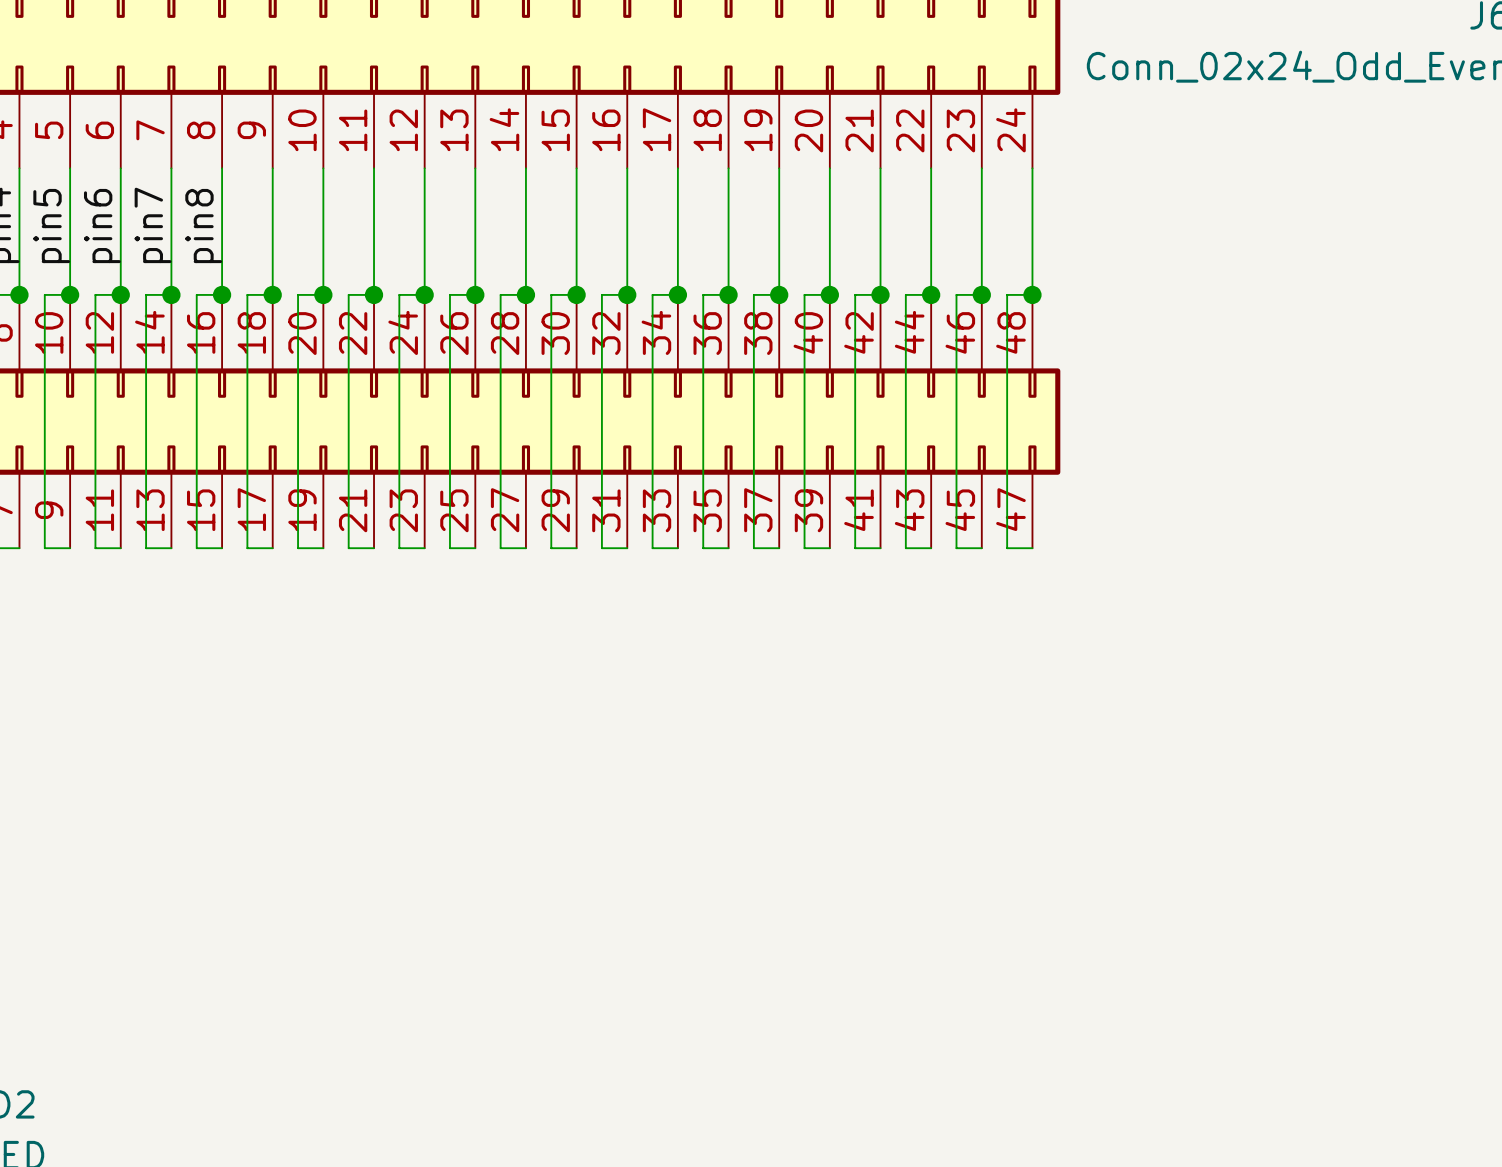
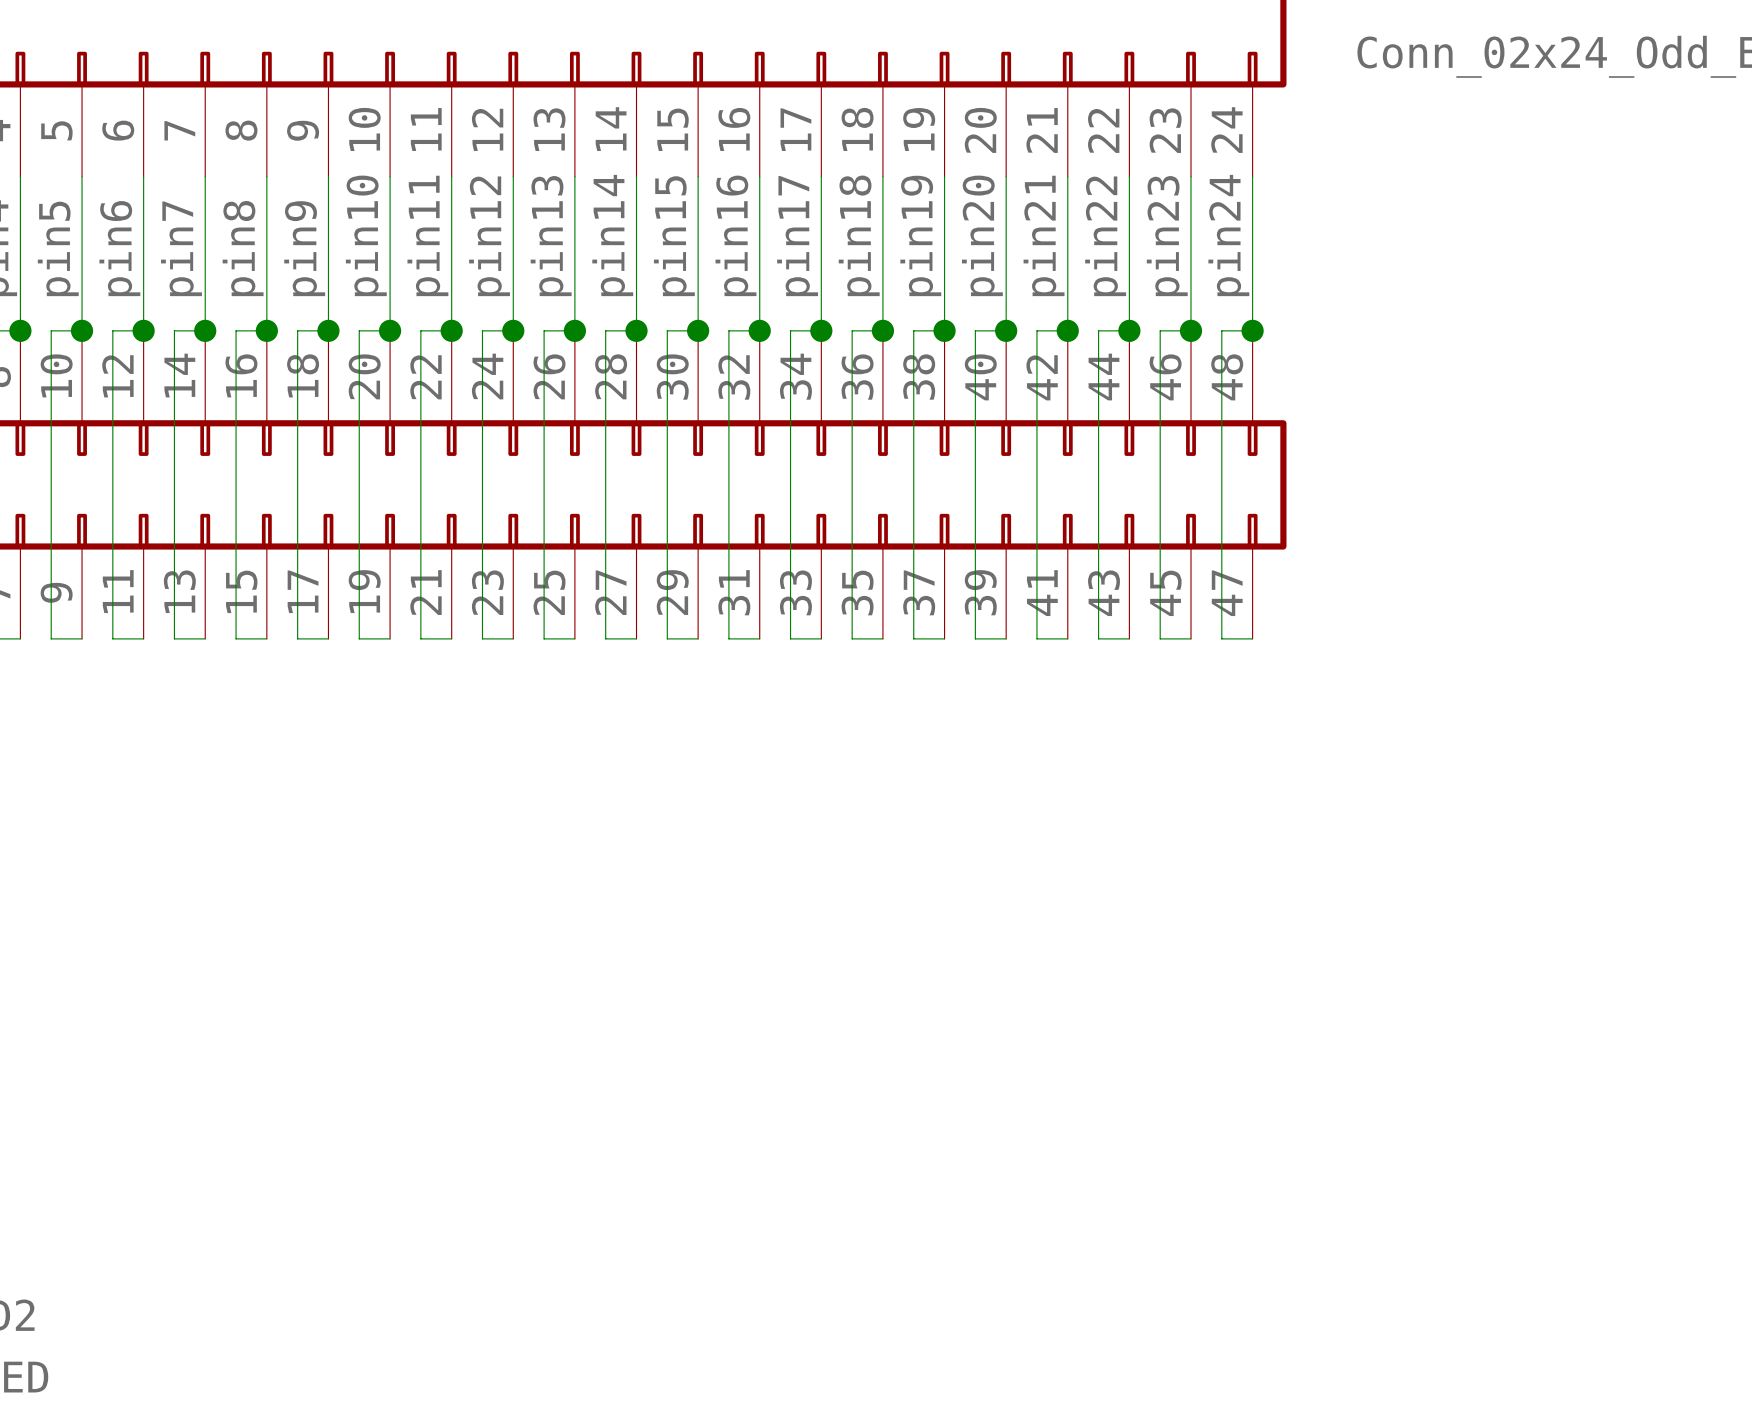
label: none -> pin10 (366, 235)
label: none -> pin11 (427, 235)
label: none -> pin12 (489, 236)
label: none -> pin13 (551, 236)
label: none -> pin14 (612, 235)
label: none -> pin15 (674, 236)
label: none -> pin16 (735, 235)
label: none -> pin17 (797, 236)
label: none -> pin18 (859, 235)
label: none -> pin19 (920, 235)
label: none -> pin20 (982, 235)
label: none -> pin21 (1044, 235)
label: none -> pin22 (1105, 236)
label: none -> pin23 (1167, 236)
label: none -> pin24 (1228, 235)
label: none -> pin9 (304, 248)

